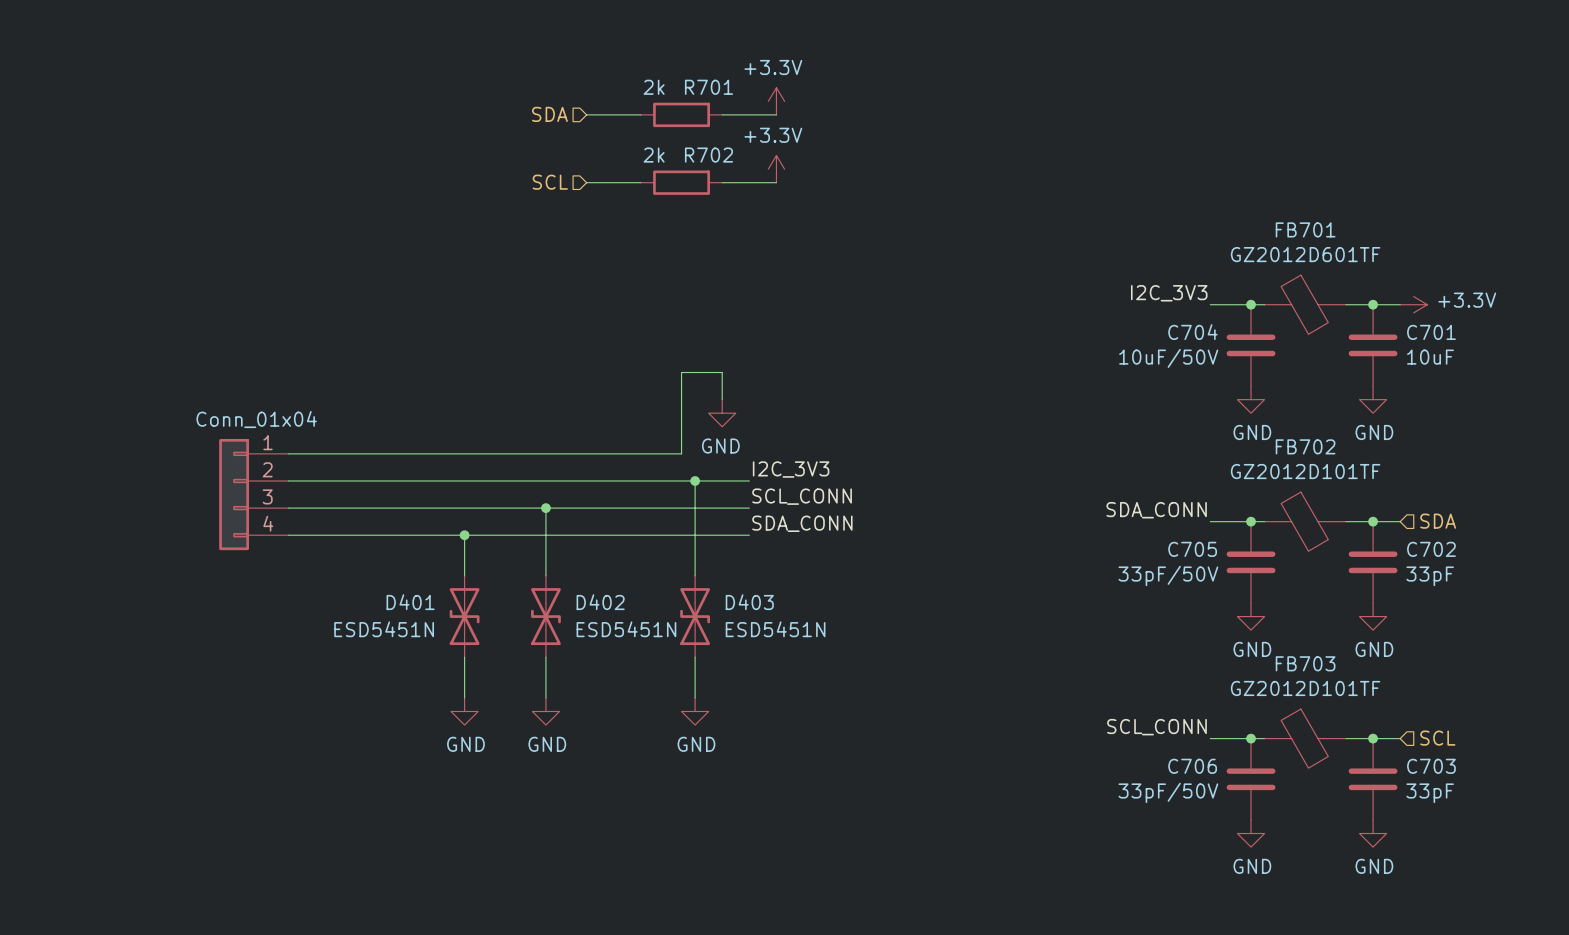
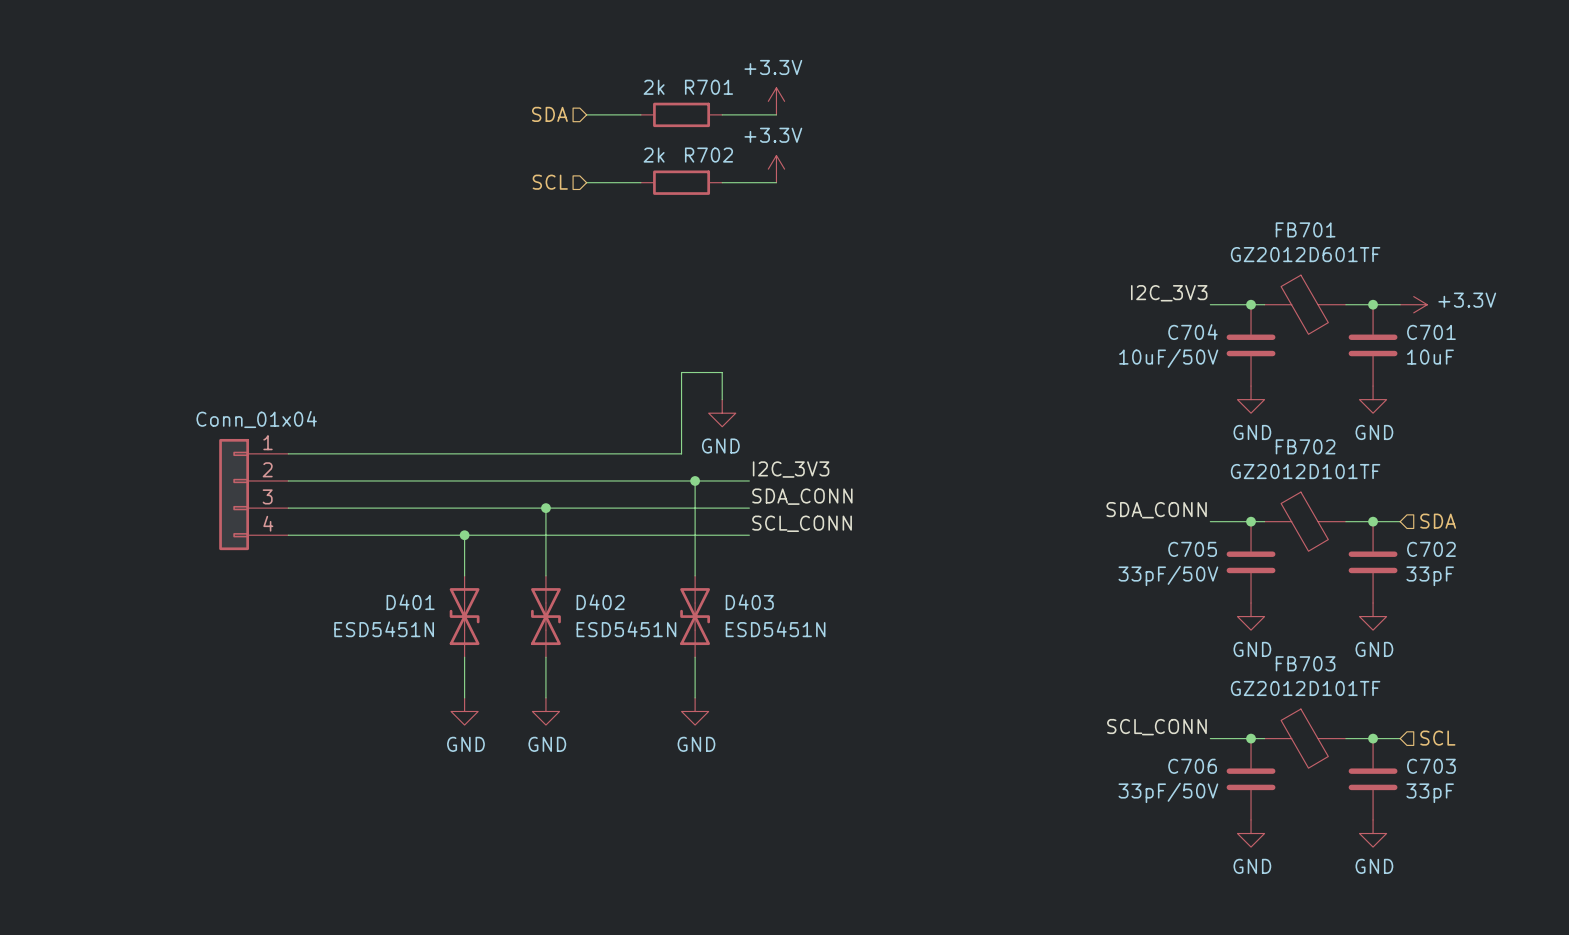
label: SCL_CONN (802, 496) -> SDA_CONN (802, 496)
label: SDA_CONN (802, 523) -> SCL_CONN (802, 523)

